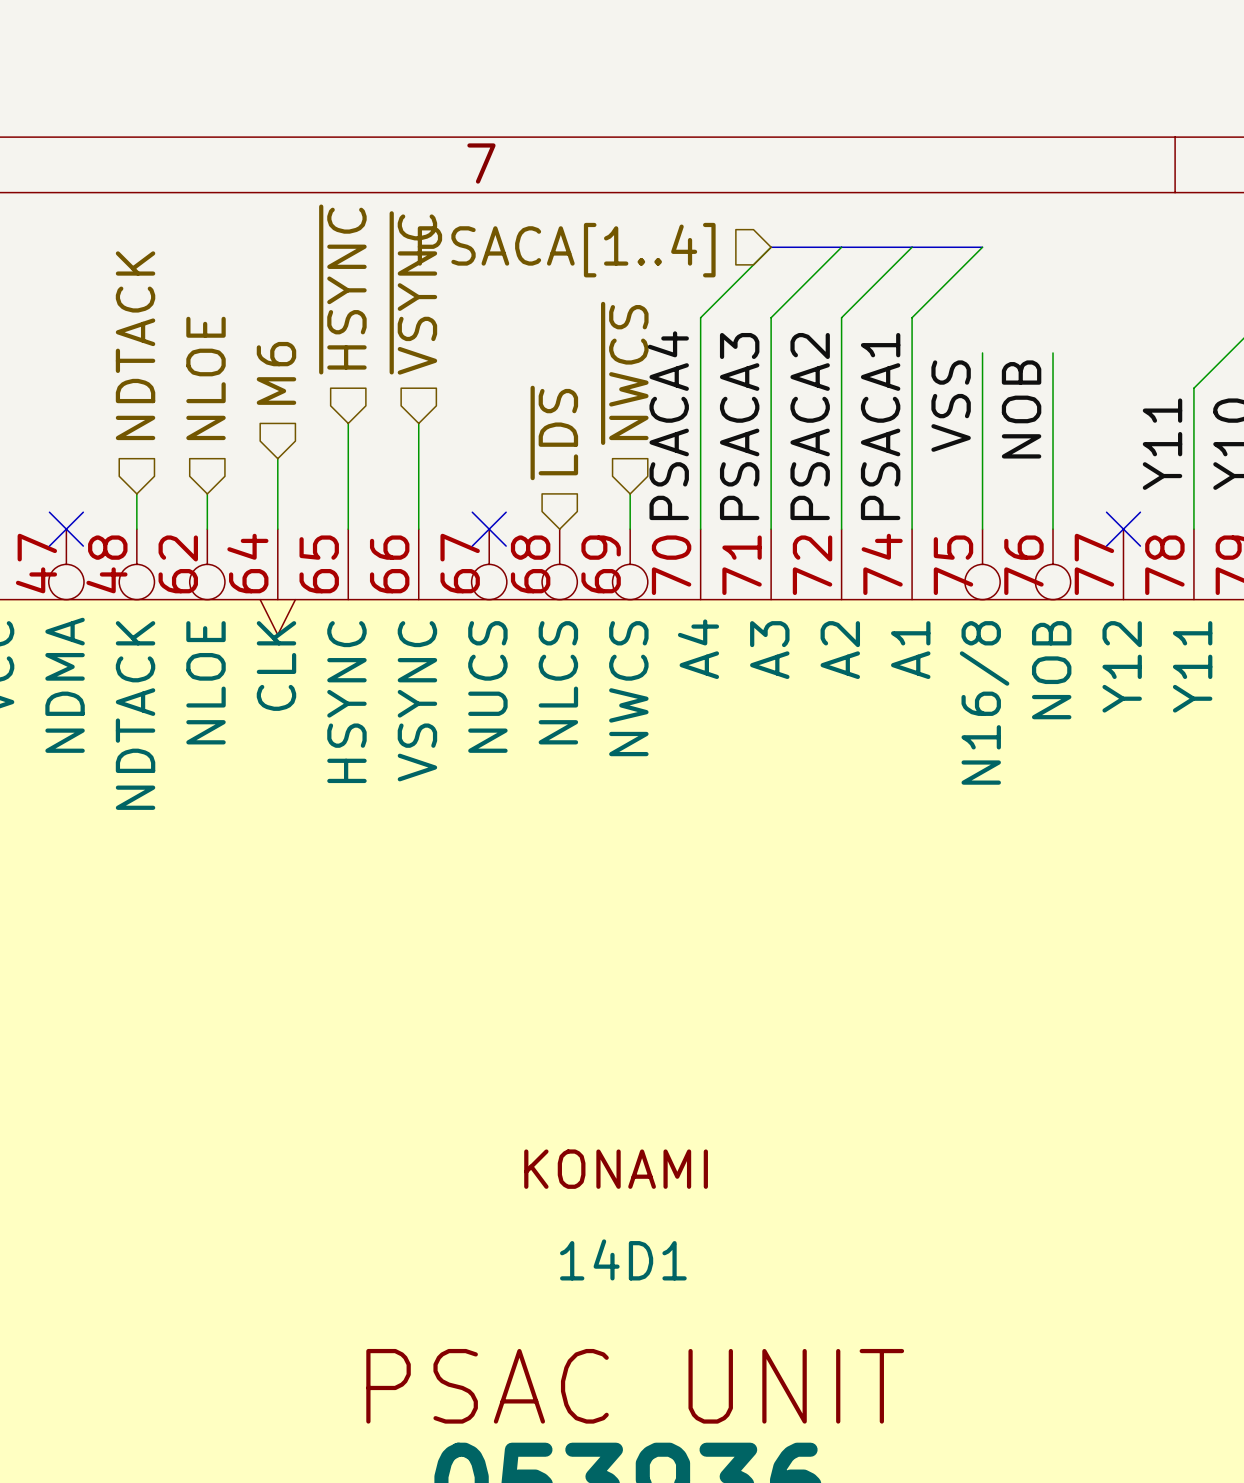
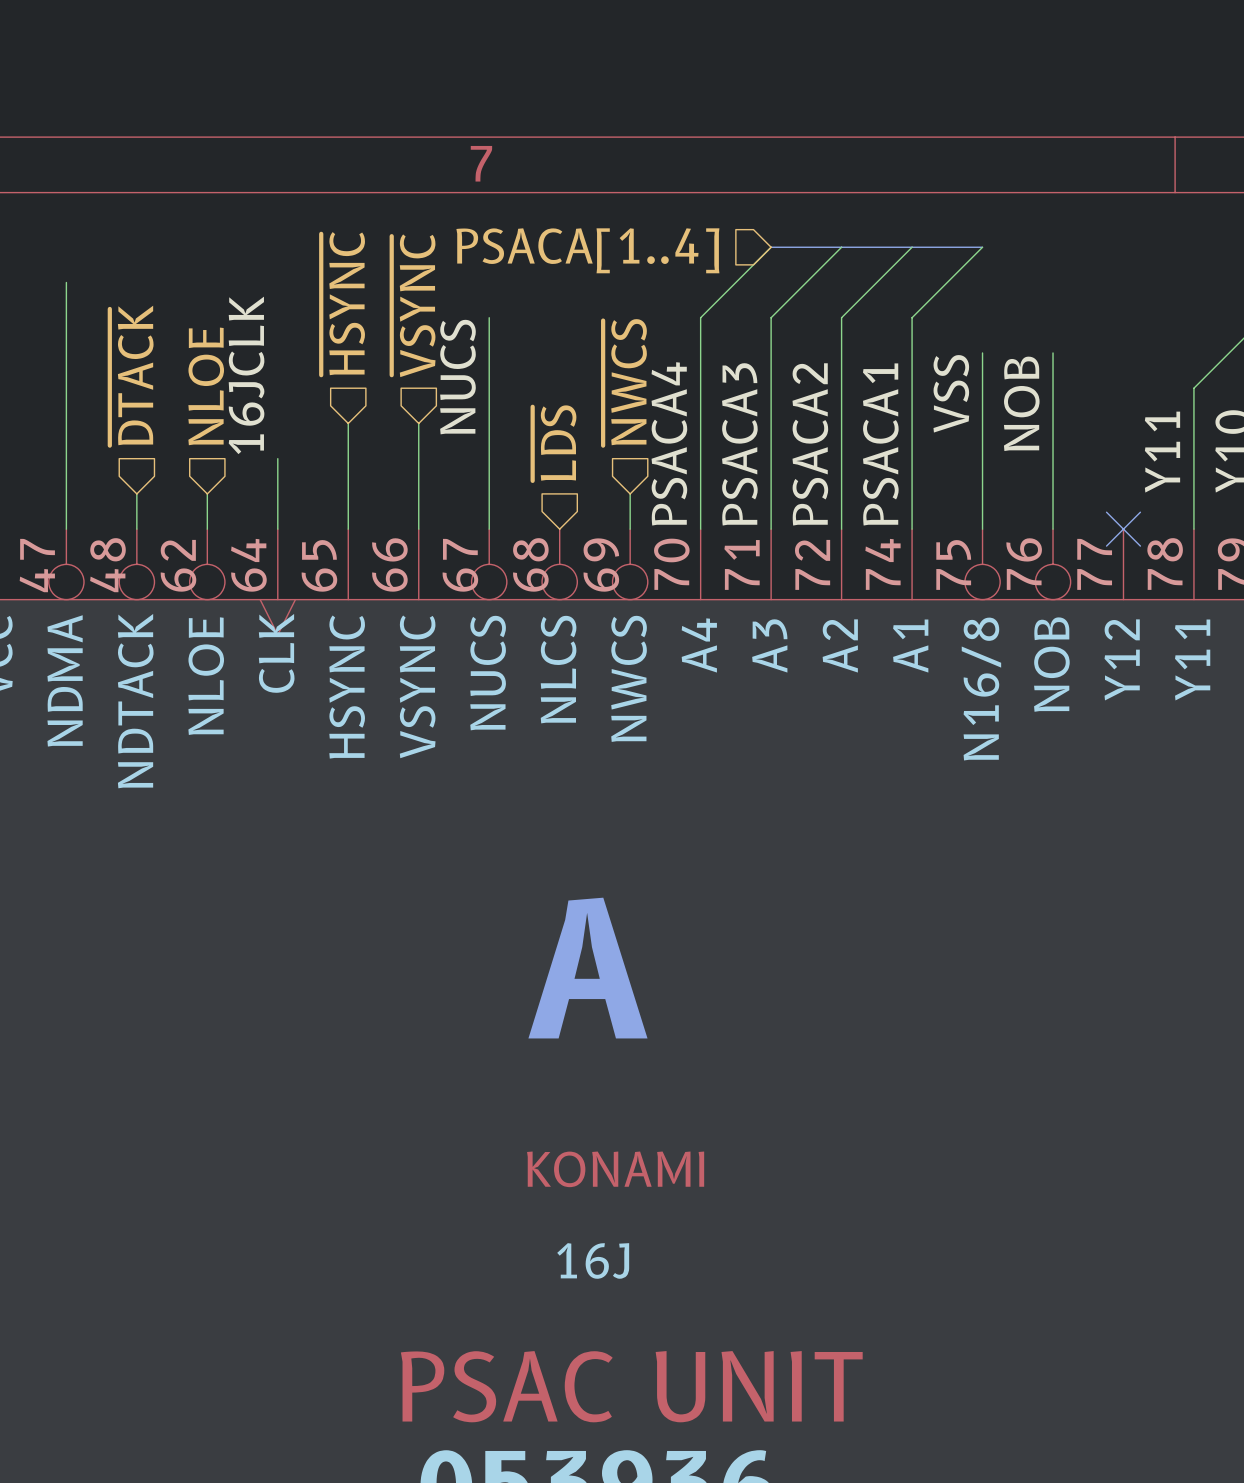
wire: none -> (66, 282) (66, 529)
wire: none -> (489, 317) (489, 529)
hierarchical label: NDTACK (135, 345) -> ~{DTACK} (131, 375)
label: none -> 16JCLK (246, 375)
hierarchical label: M6 (276, 373) -> none
label: none -> NUCS (457, 377)
no-connect mark: (66, 529) -> none
no-connect mark: (489, 529) -> none
text: none -> A (587, 968)
14D1 name: 14D1 (623, 1259) -> 16J (593, 1260)

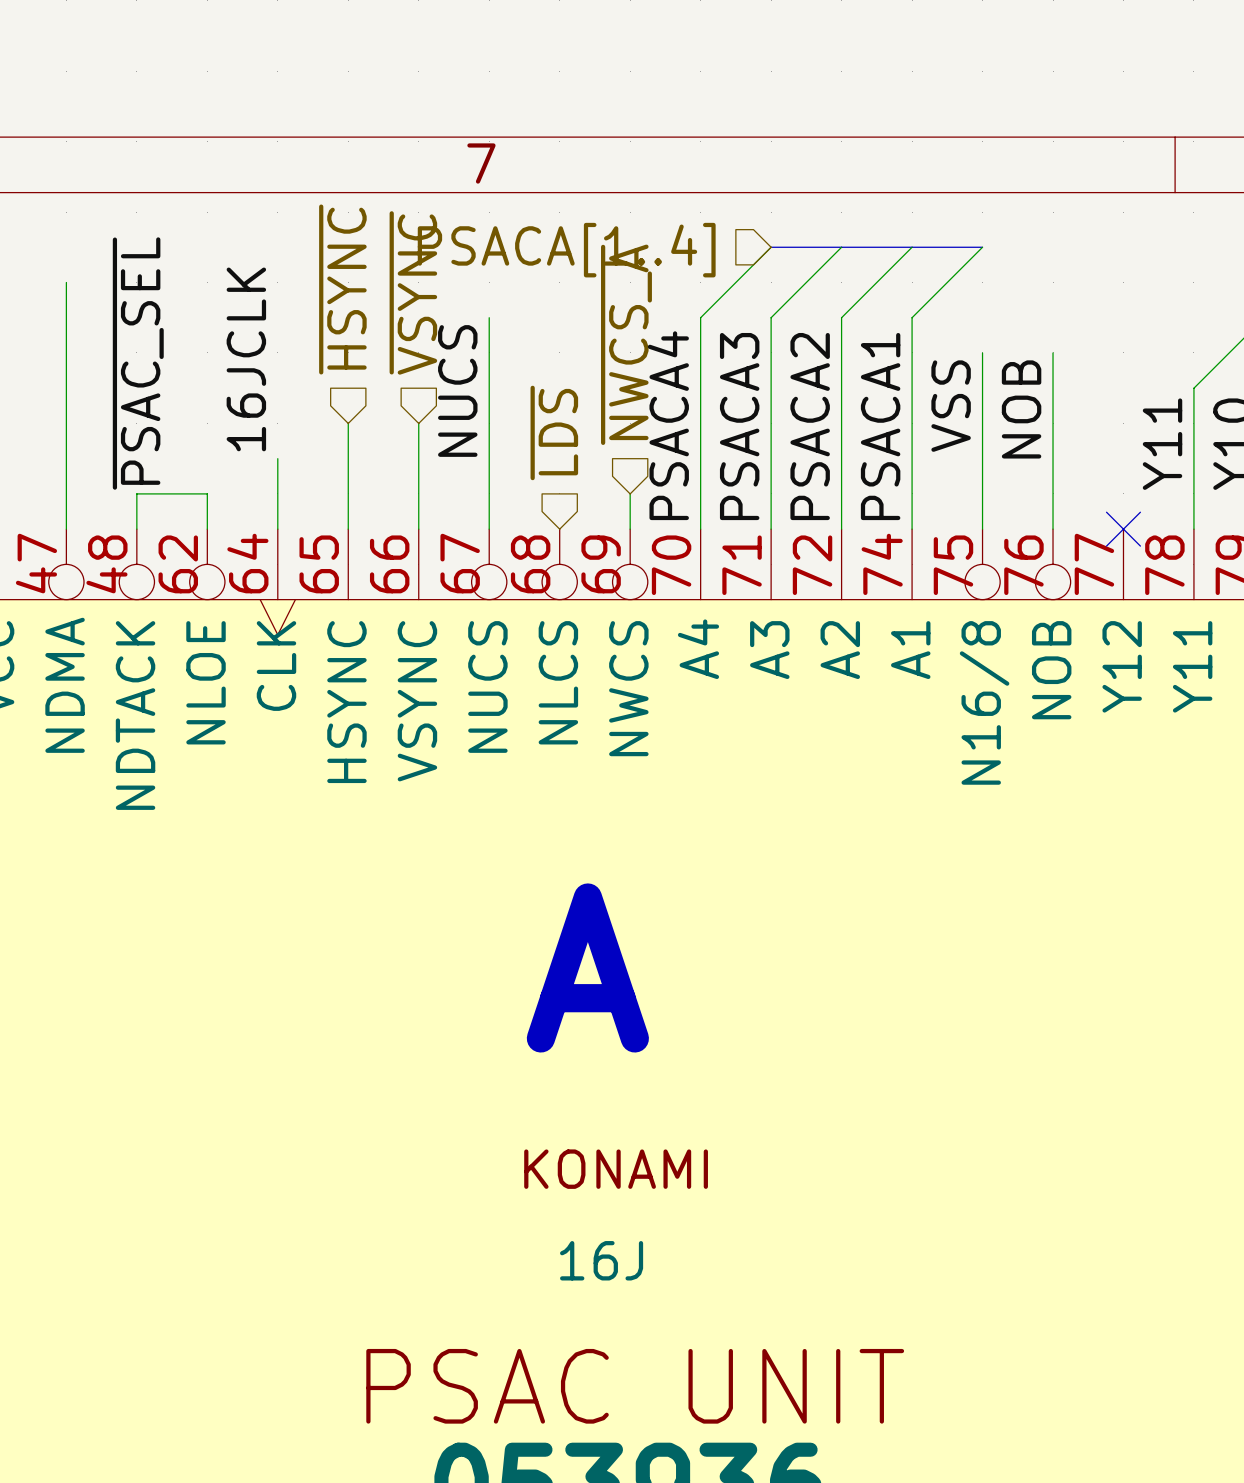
hierarchical label: ~{DTACK} (131, 375) -> none
hierarchical label: ~{NWCS} (624, 382) -> ~{NWCS_A} (626, 344)
label: none -> ~{PSAC_SEL} (138, 363)
hierarchical label: NLOE (206, 386) -> none
wire: none -> (136, 493) (207, 493)

